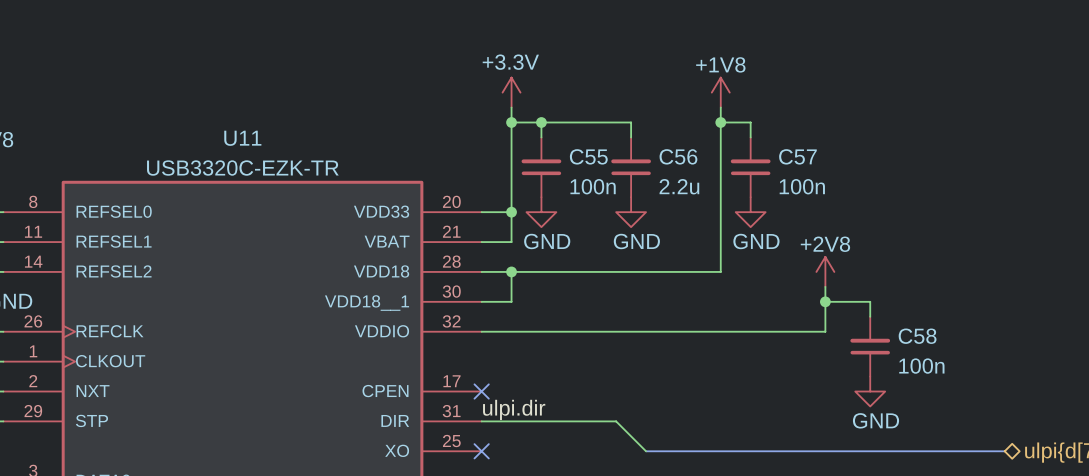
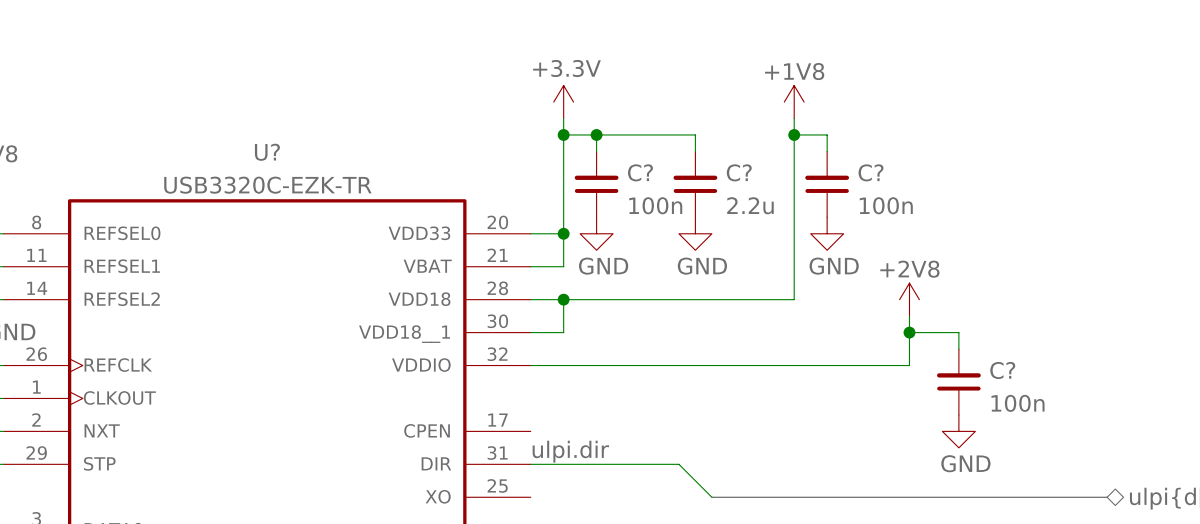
U11 name: U11 (242, 138) -> U? (267, 152)
C55 name: C55 (588, 156) -> C? (640, 172)
C56 name: C56 (678, 156) -> C? (739, 172)
C57 name: C57 (797, 156) -> C? (871, 172)
C58 name: C58 (917, 336) -> C? (1002, 370)
no-connect mark: (481, 391) -> none
no-connect mark: (481, 451) -> none

